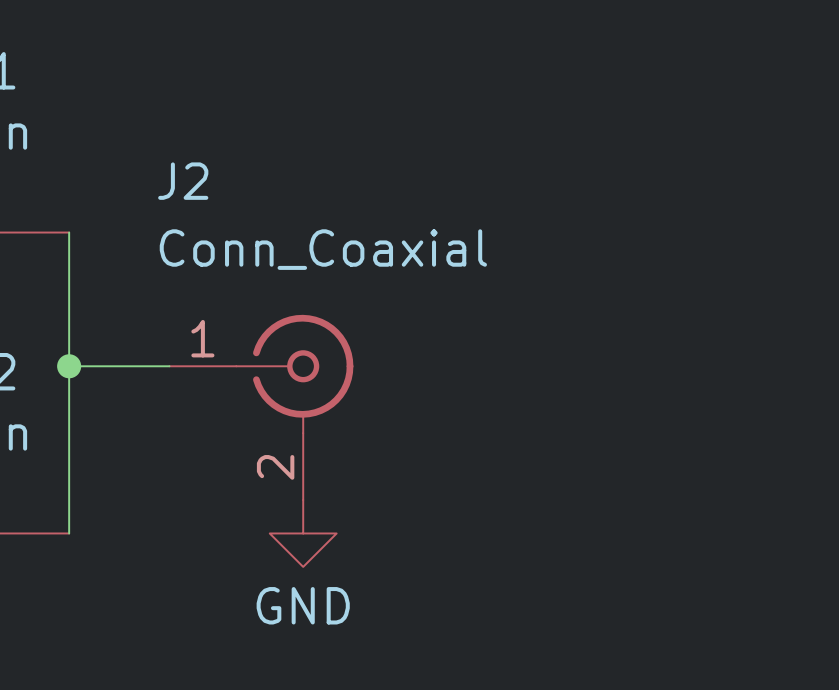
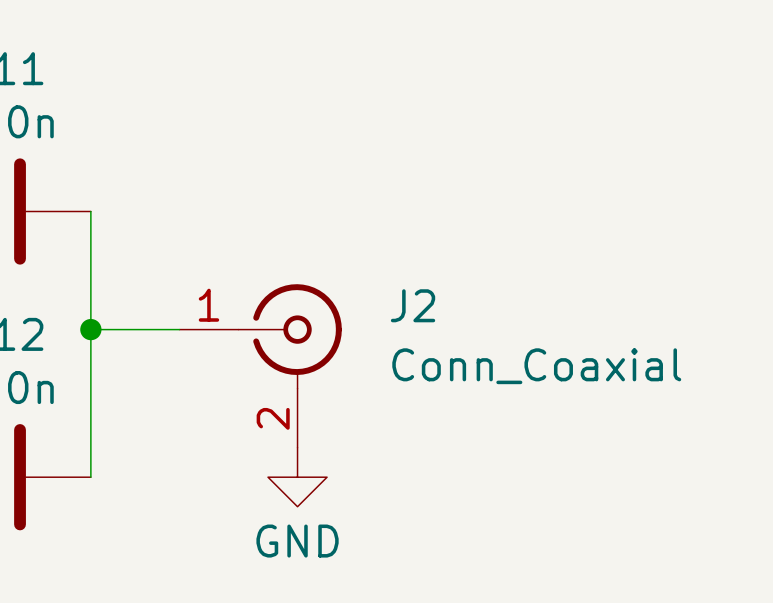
J2 name position: J2 (183, 181) -> J2 (413, 305)
J2 value position: Conn_Coaxial (323, 249) -> Conn_Coaxial (536, 366)

